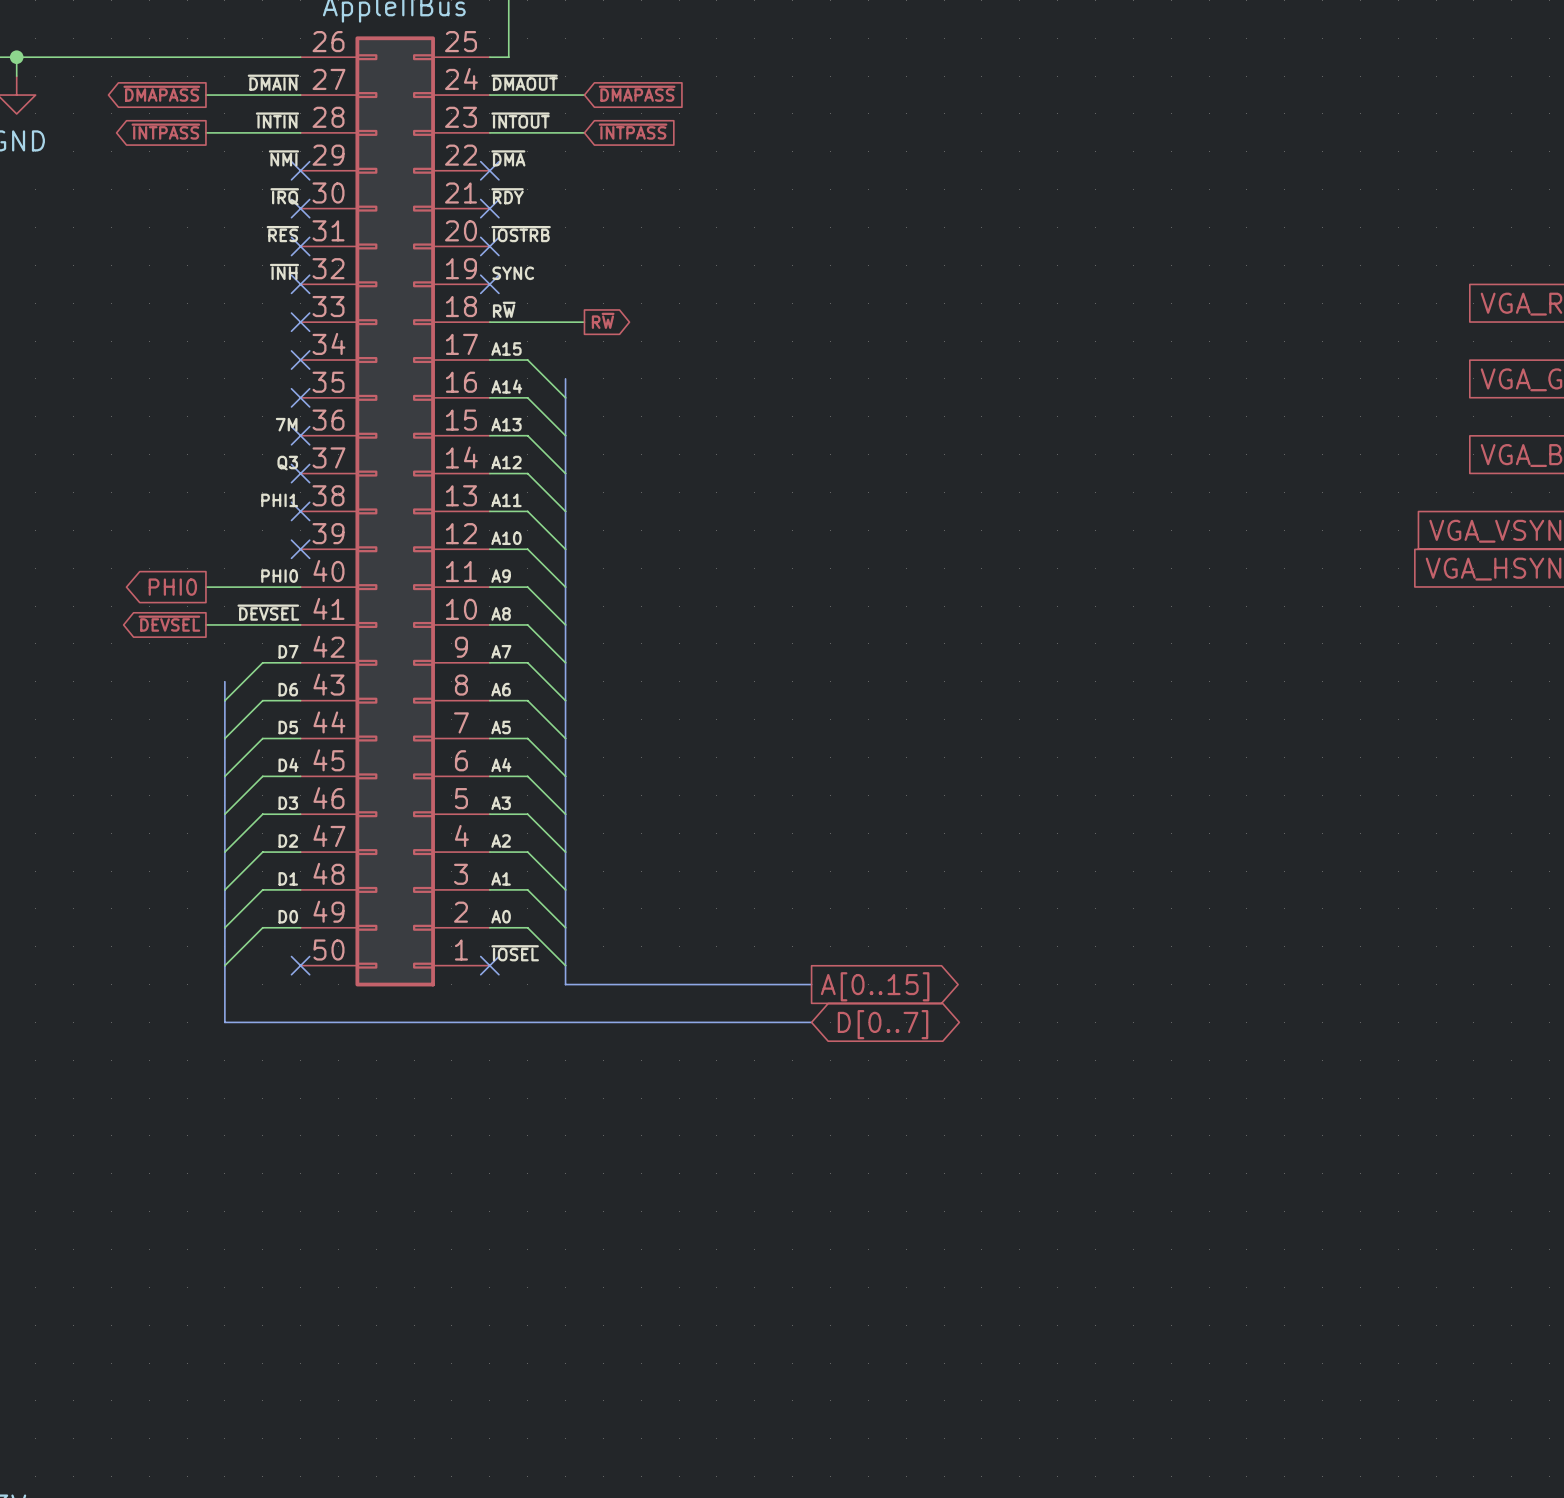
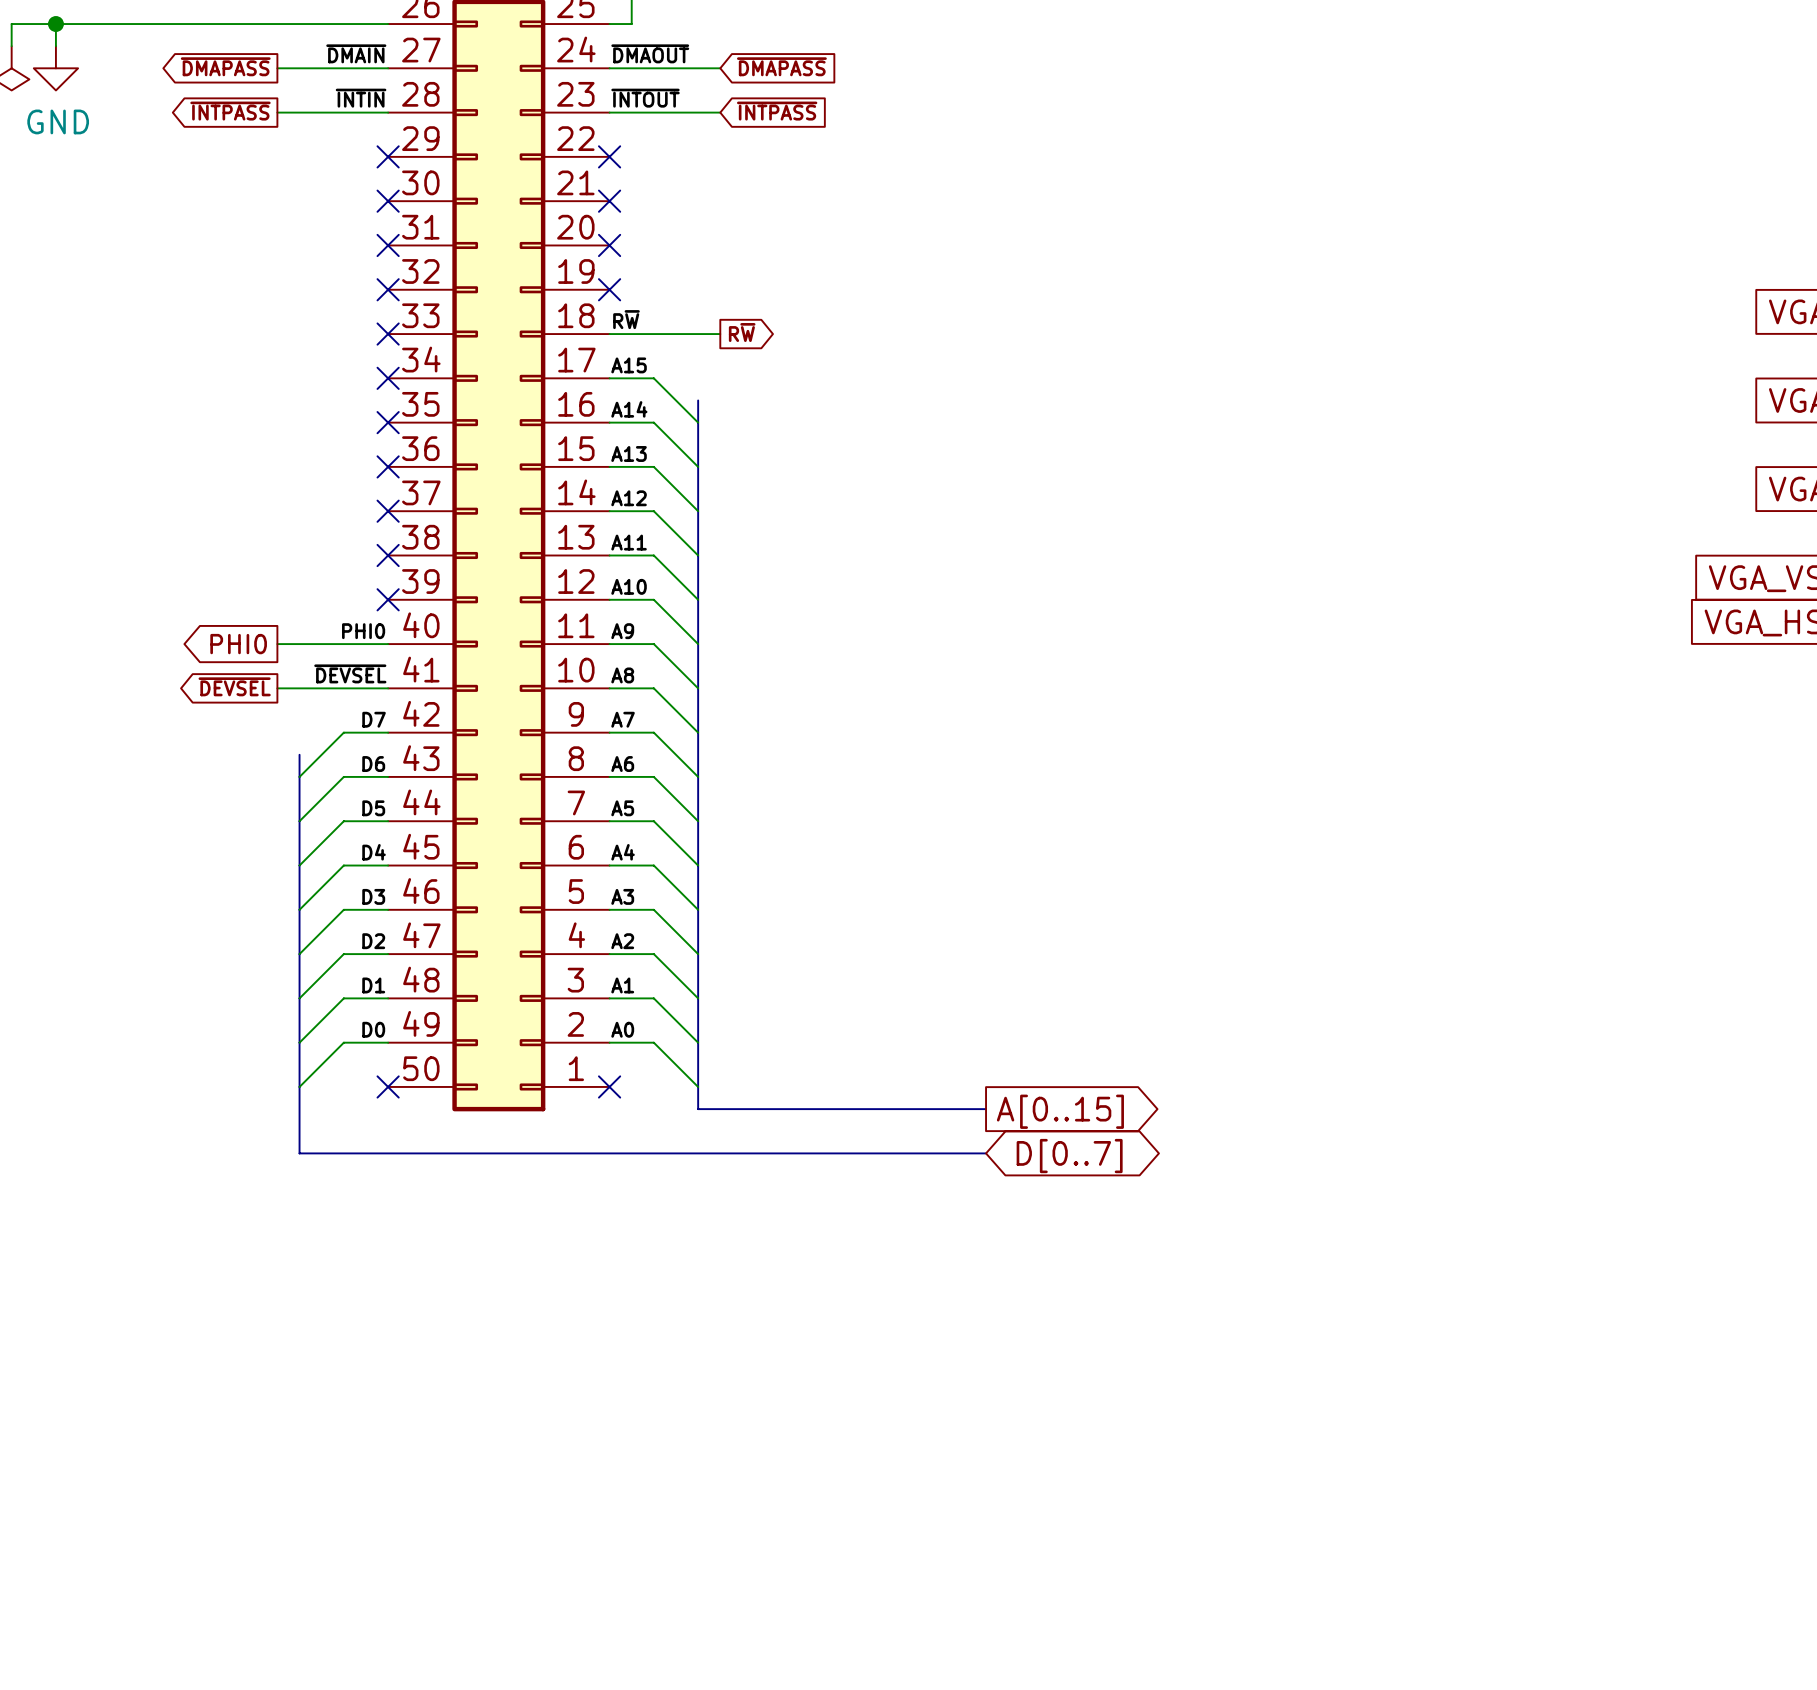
label: ~{NMI} (283, 158) -> none
label: ~{DMA} (508, 158) -> none
label: ~{IRQ} (284, 196) -> none
label: ~{RDY} (507, 196) -> none
label: ~{RES} (282, 234) -> none
label: ~{IOSTRB} (521, 234) -> none
label: ~{INH} (284, 271) -> none
label: SYNC (513, 273) -> none
label: 7M (286, 424) -> none
label: Q3 (287, 463) -> none
label: PHI1 (279, 500) -> none
label: ~{IOSEL} (515, 953) -> none

